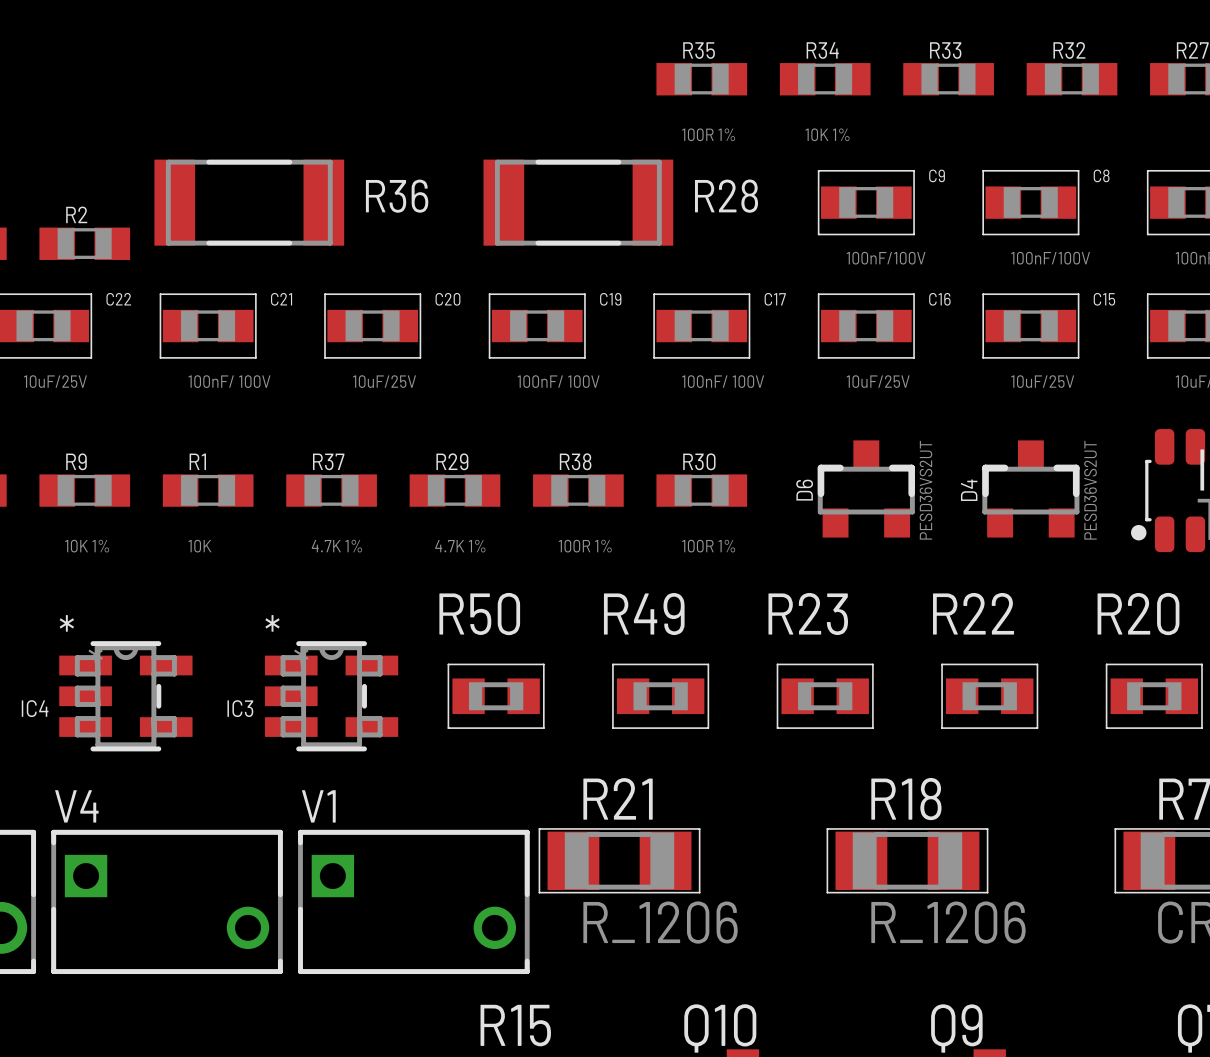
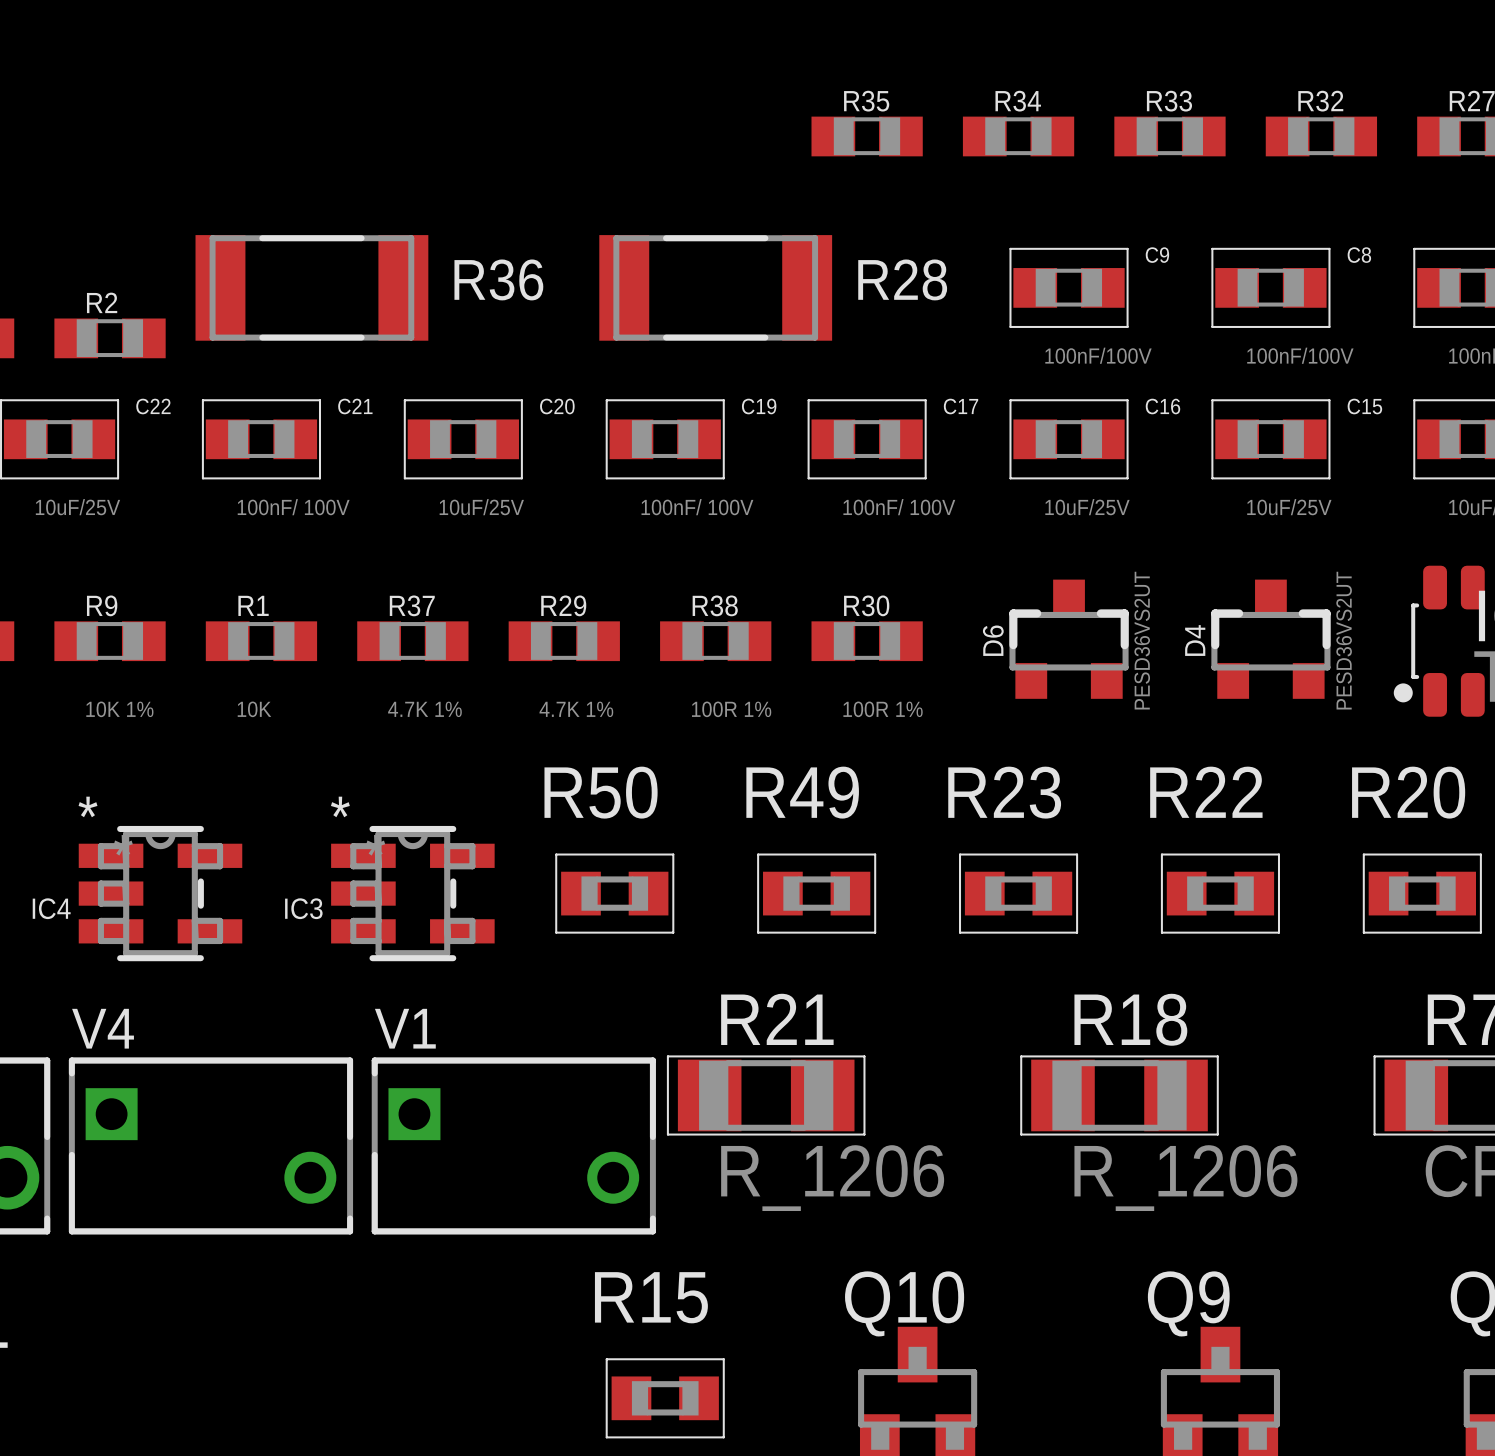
R35 value: 100R 1% (708, 134) -> none
R34 value: 10K 1% (827, 134) -> none

